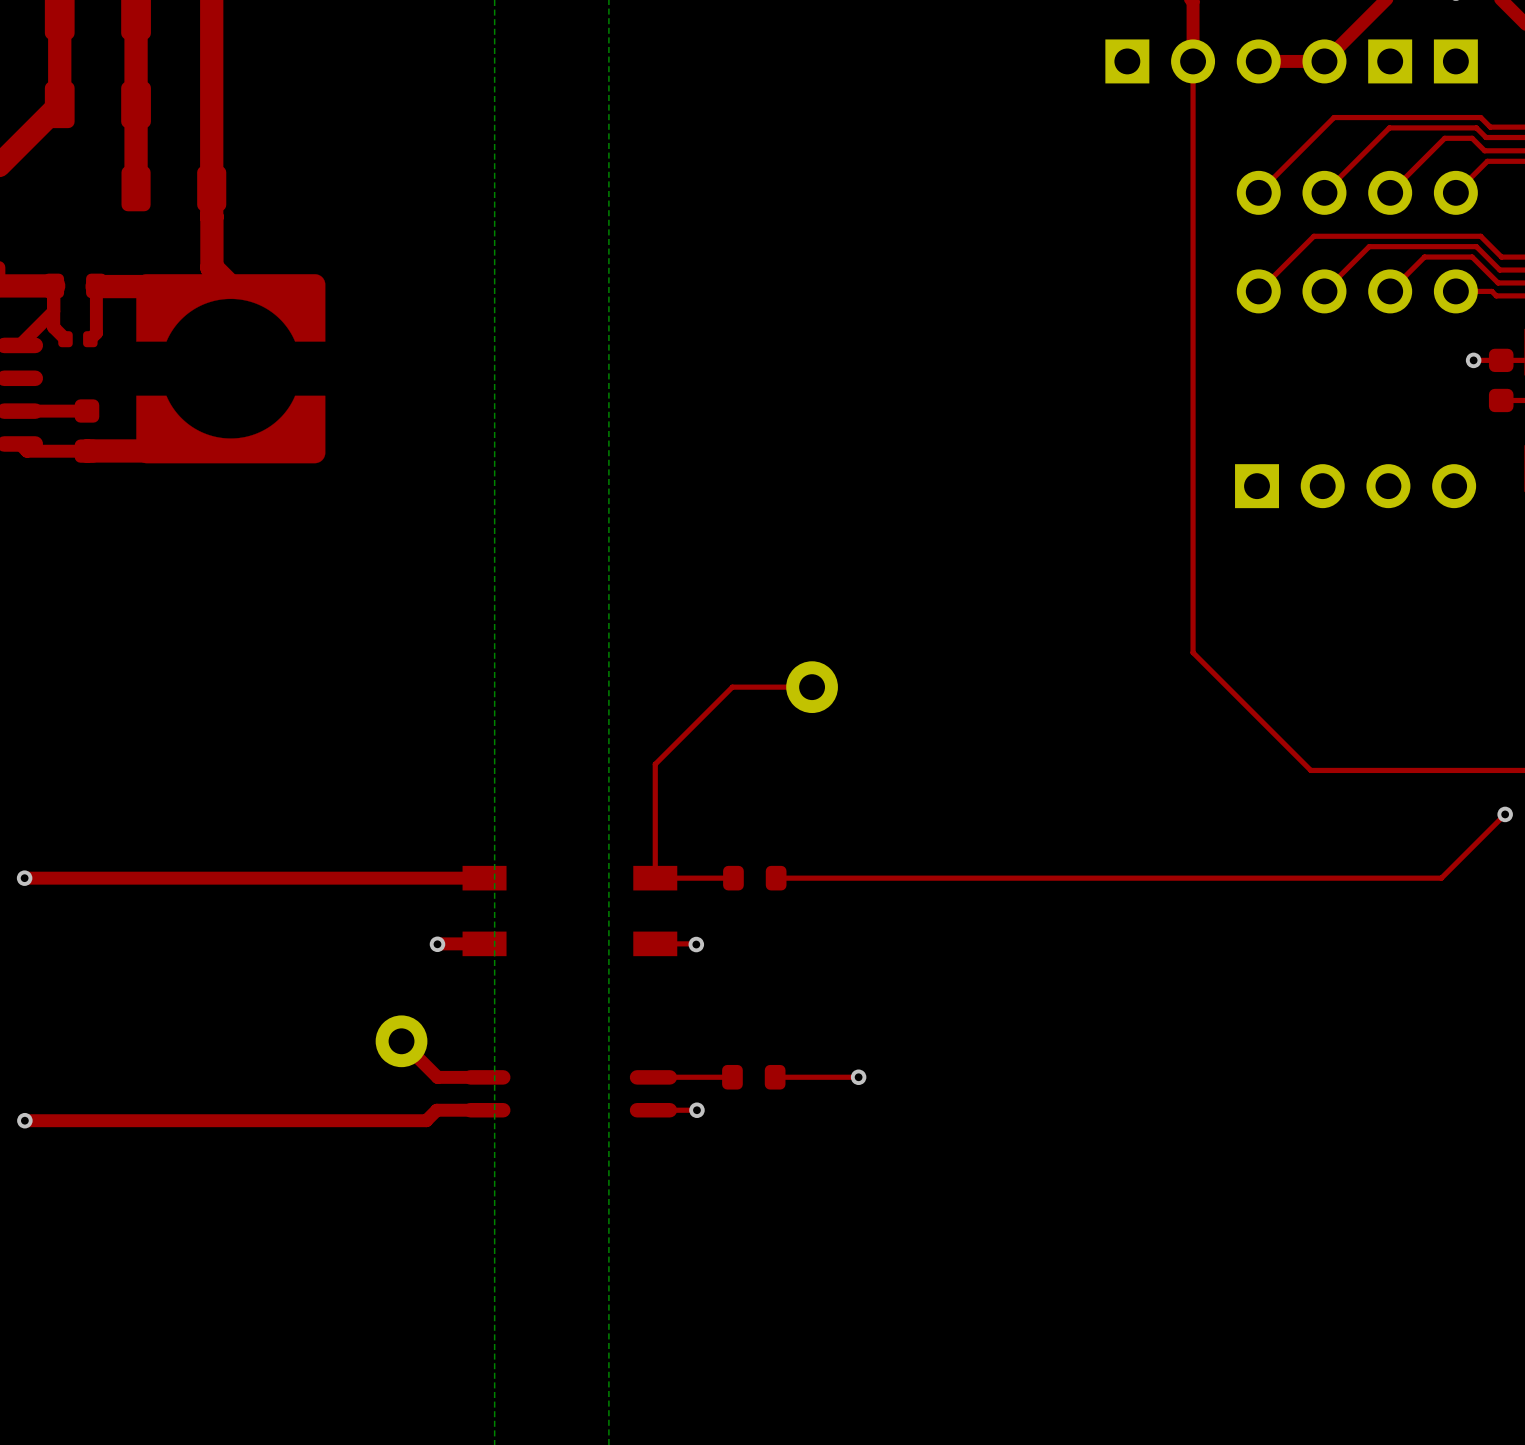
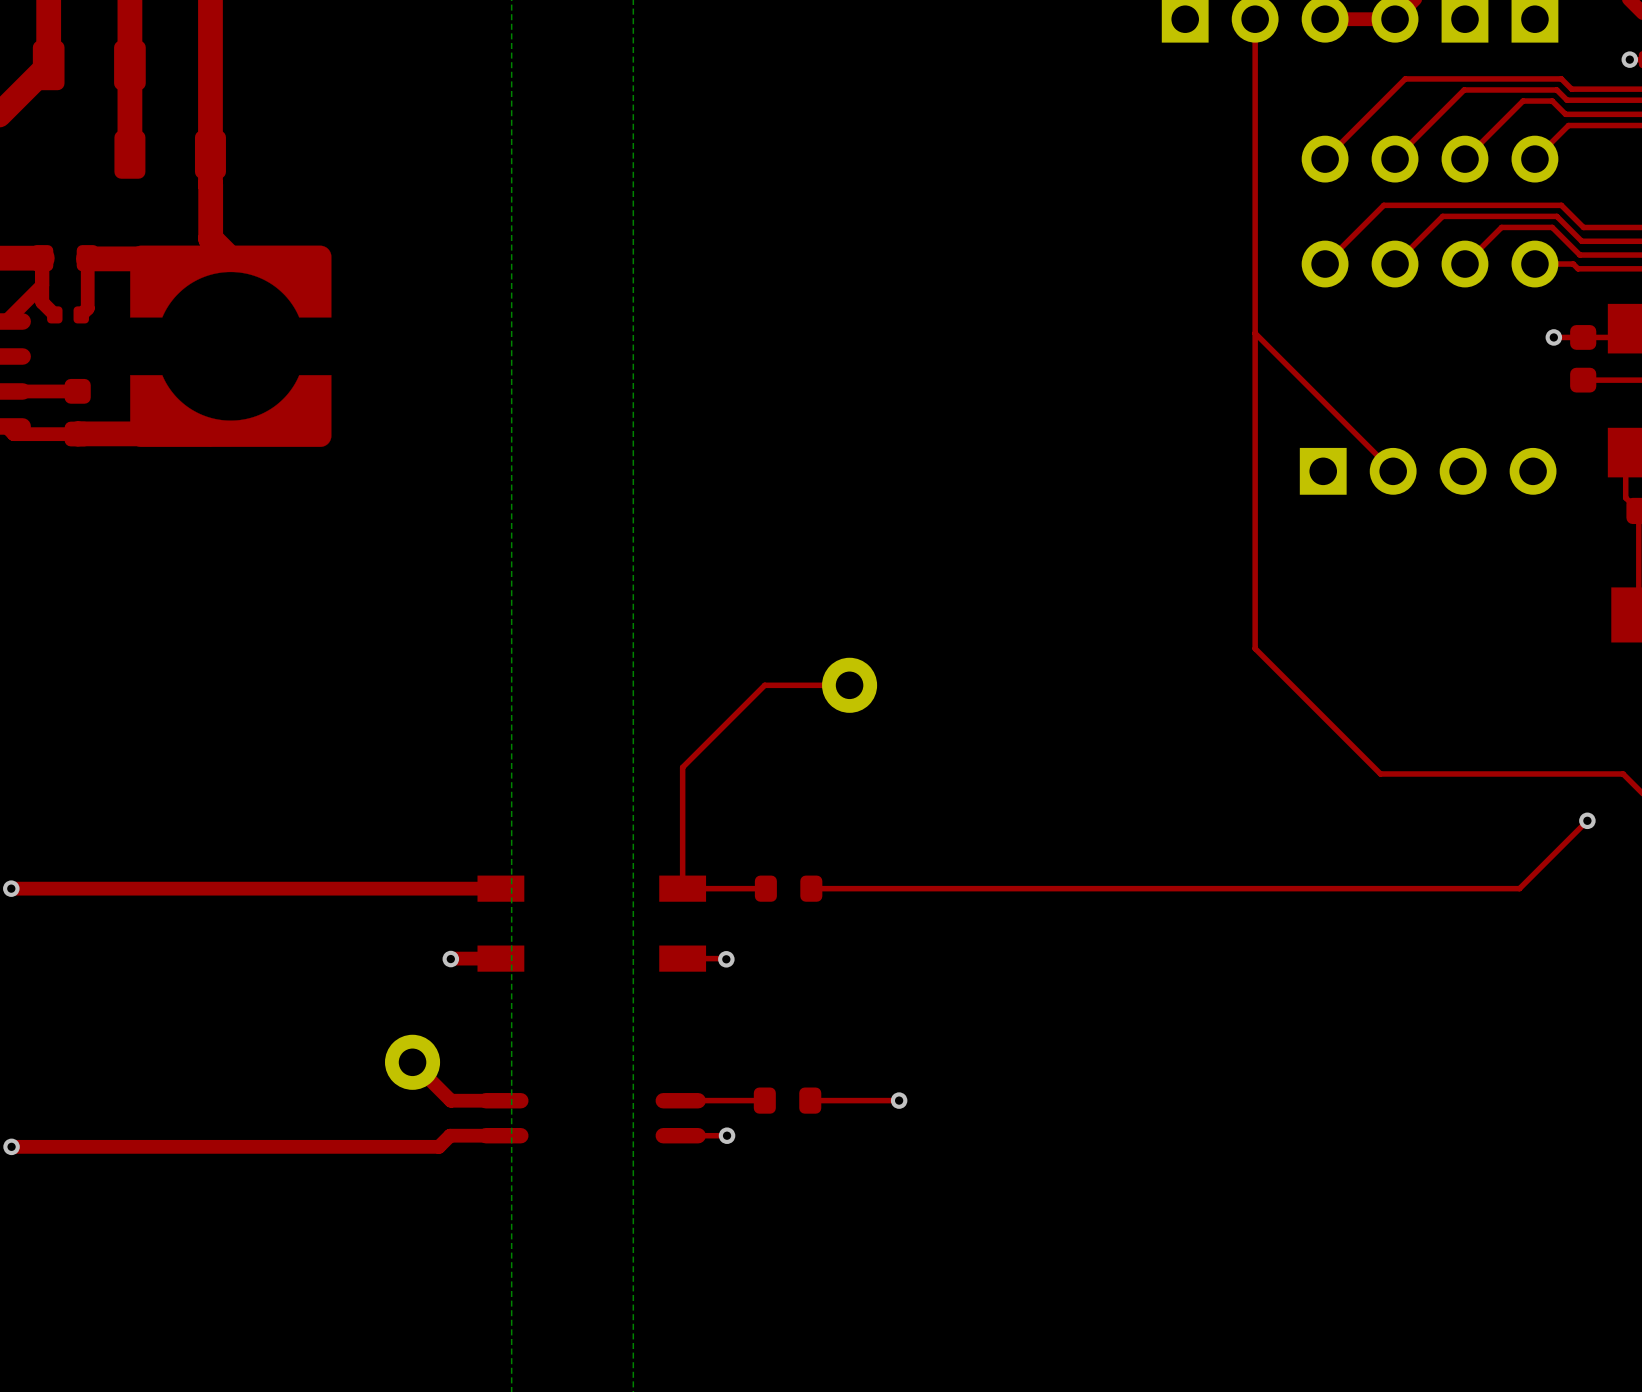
top track: none -> (1255, 333) (1393, 471)

